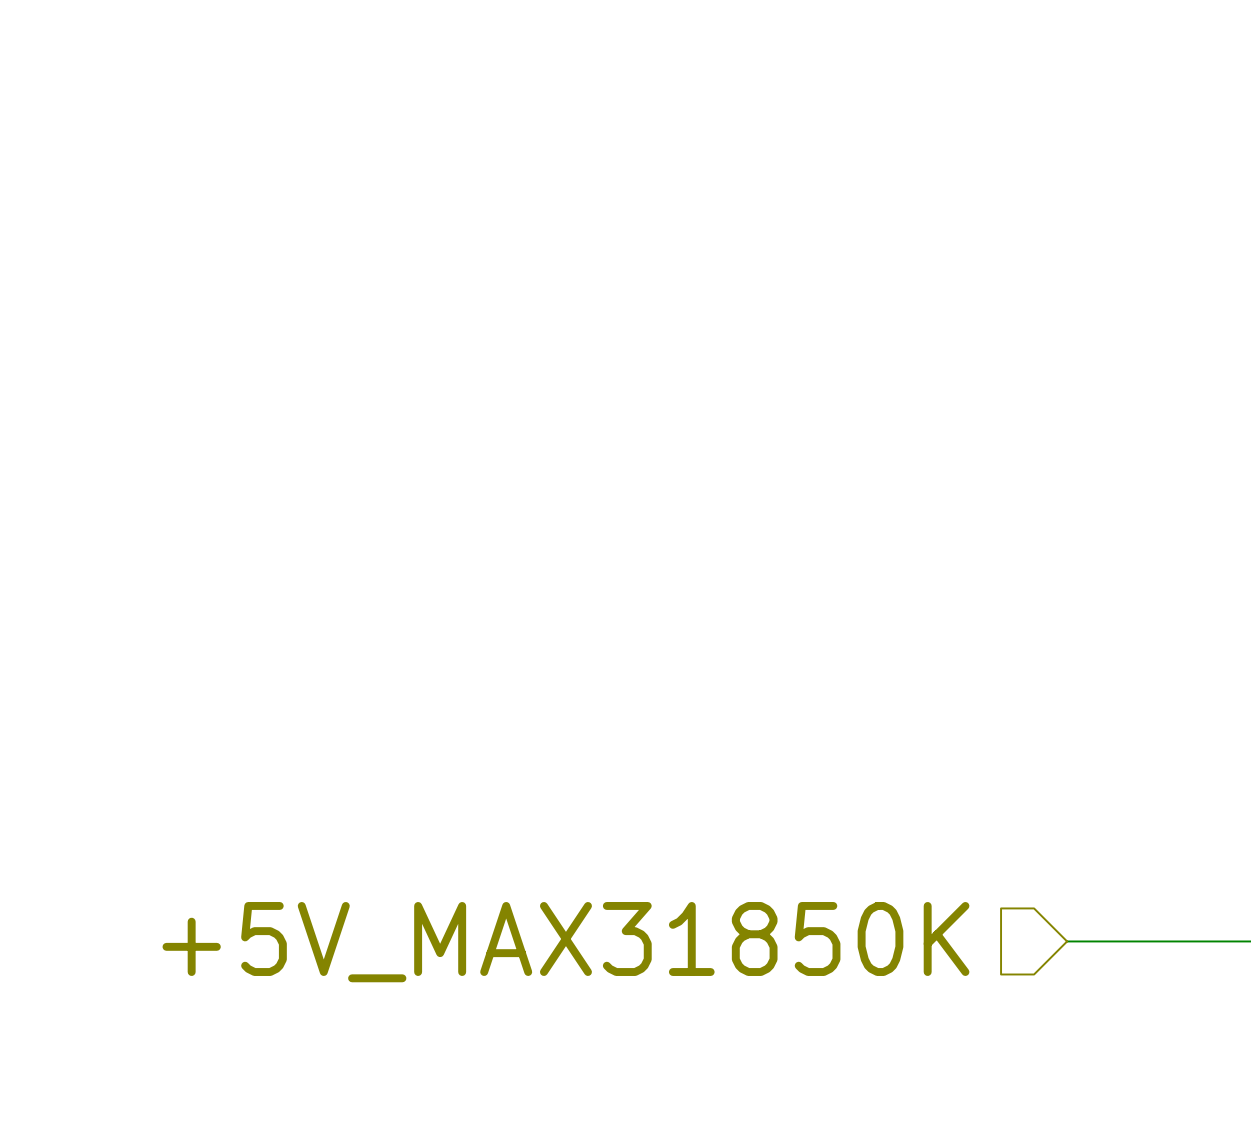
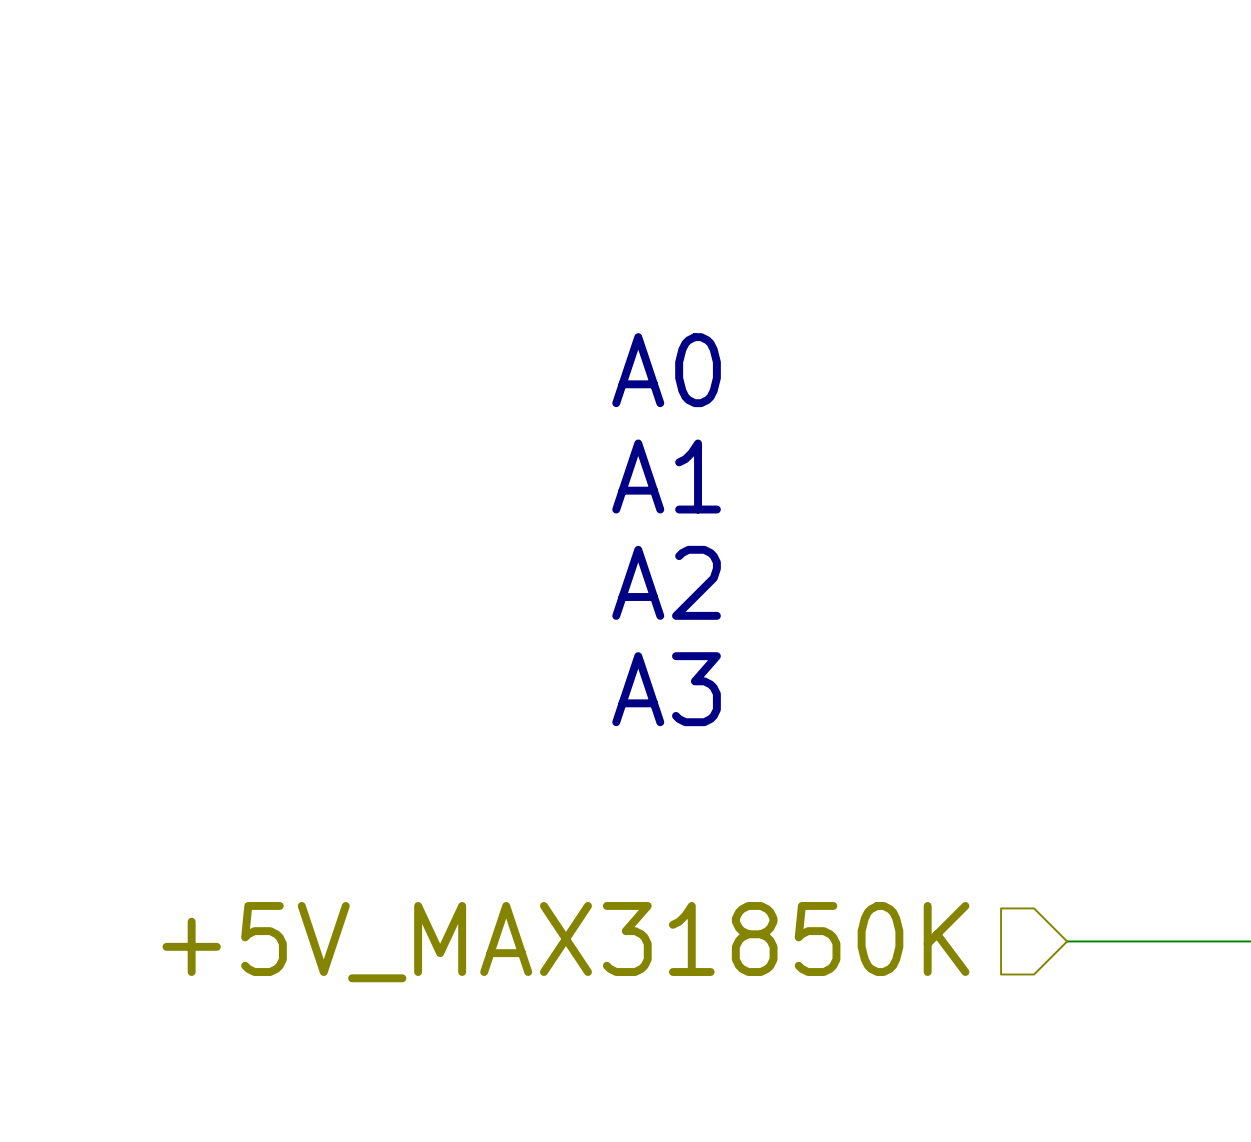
text: none -> A0 (666, 370)
text: none -> A1 (666, 476)
text: none -> A2 (666, 582)
text: none -> A3 (666, 689)

